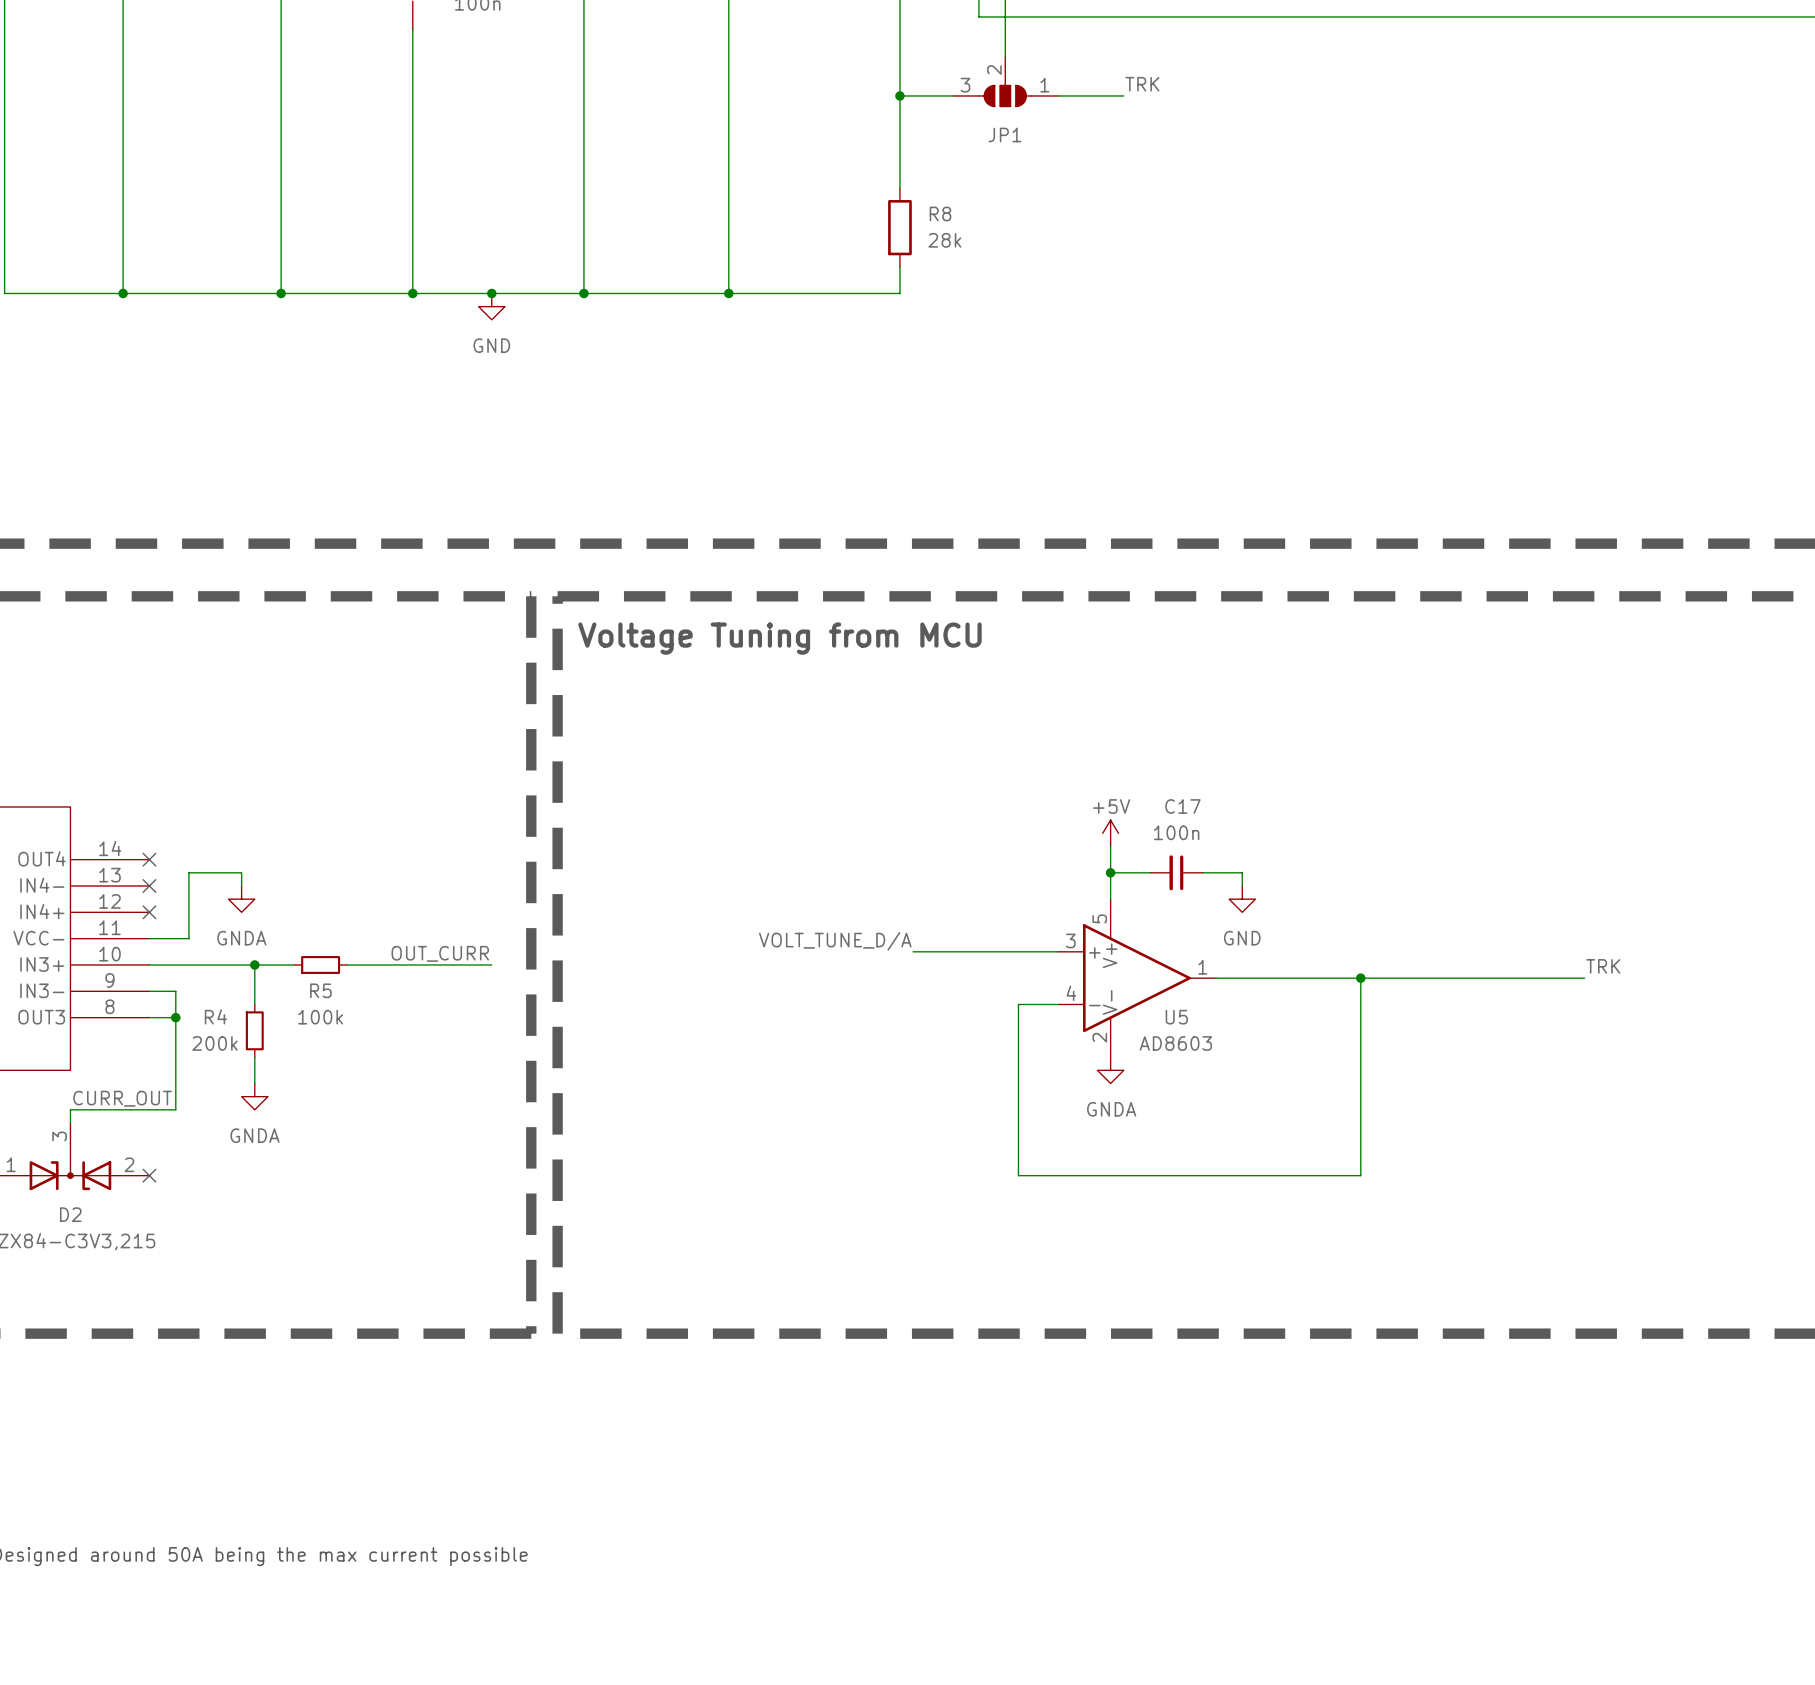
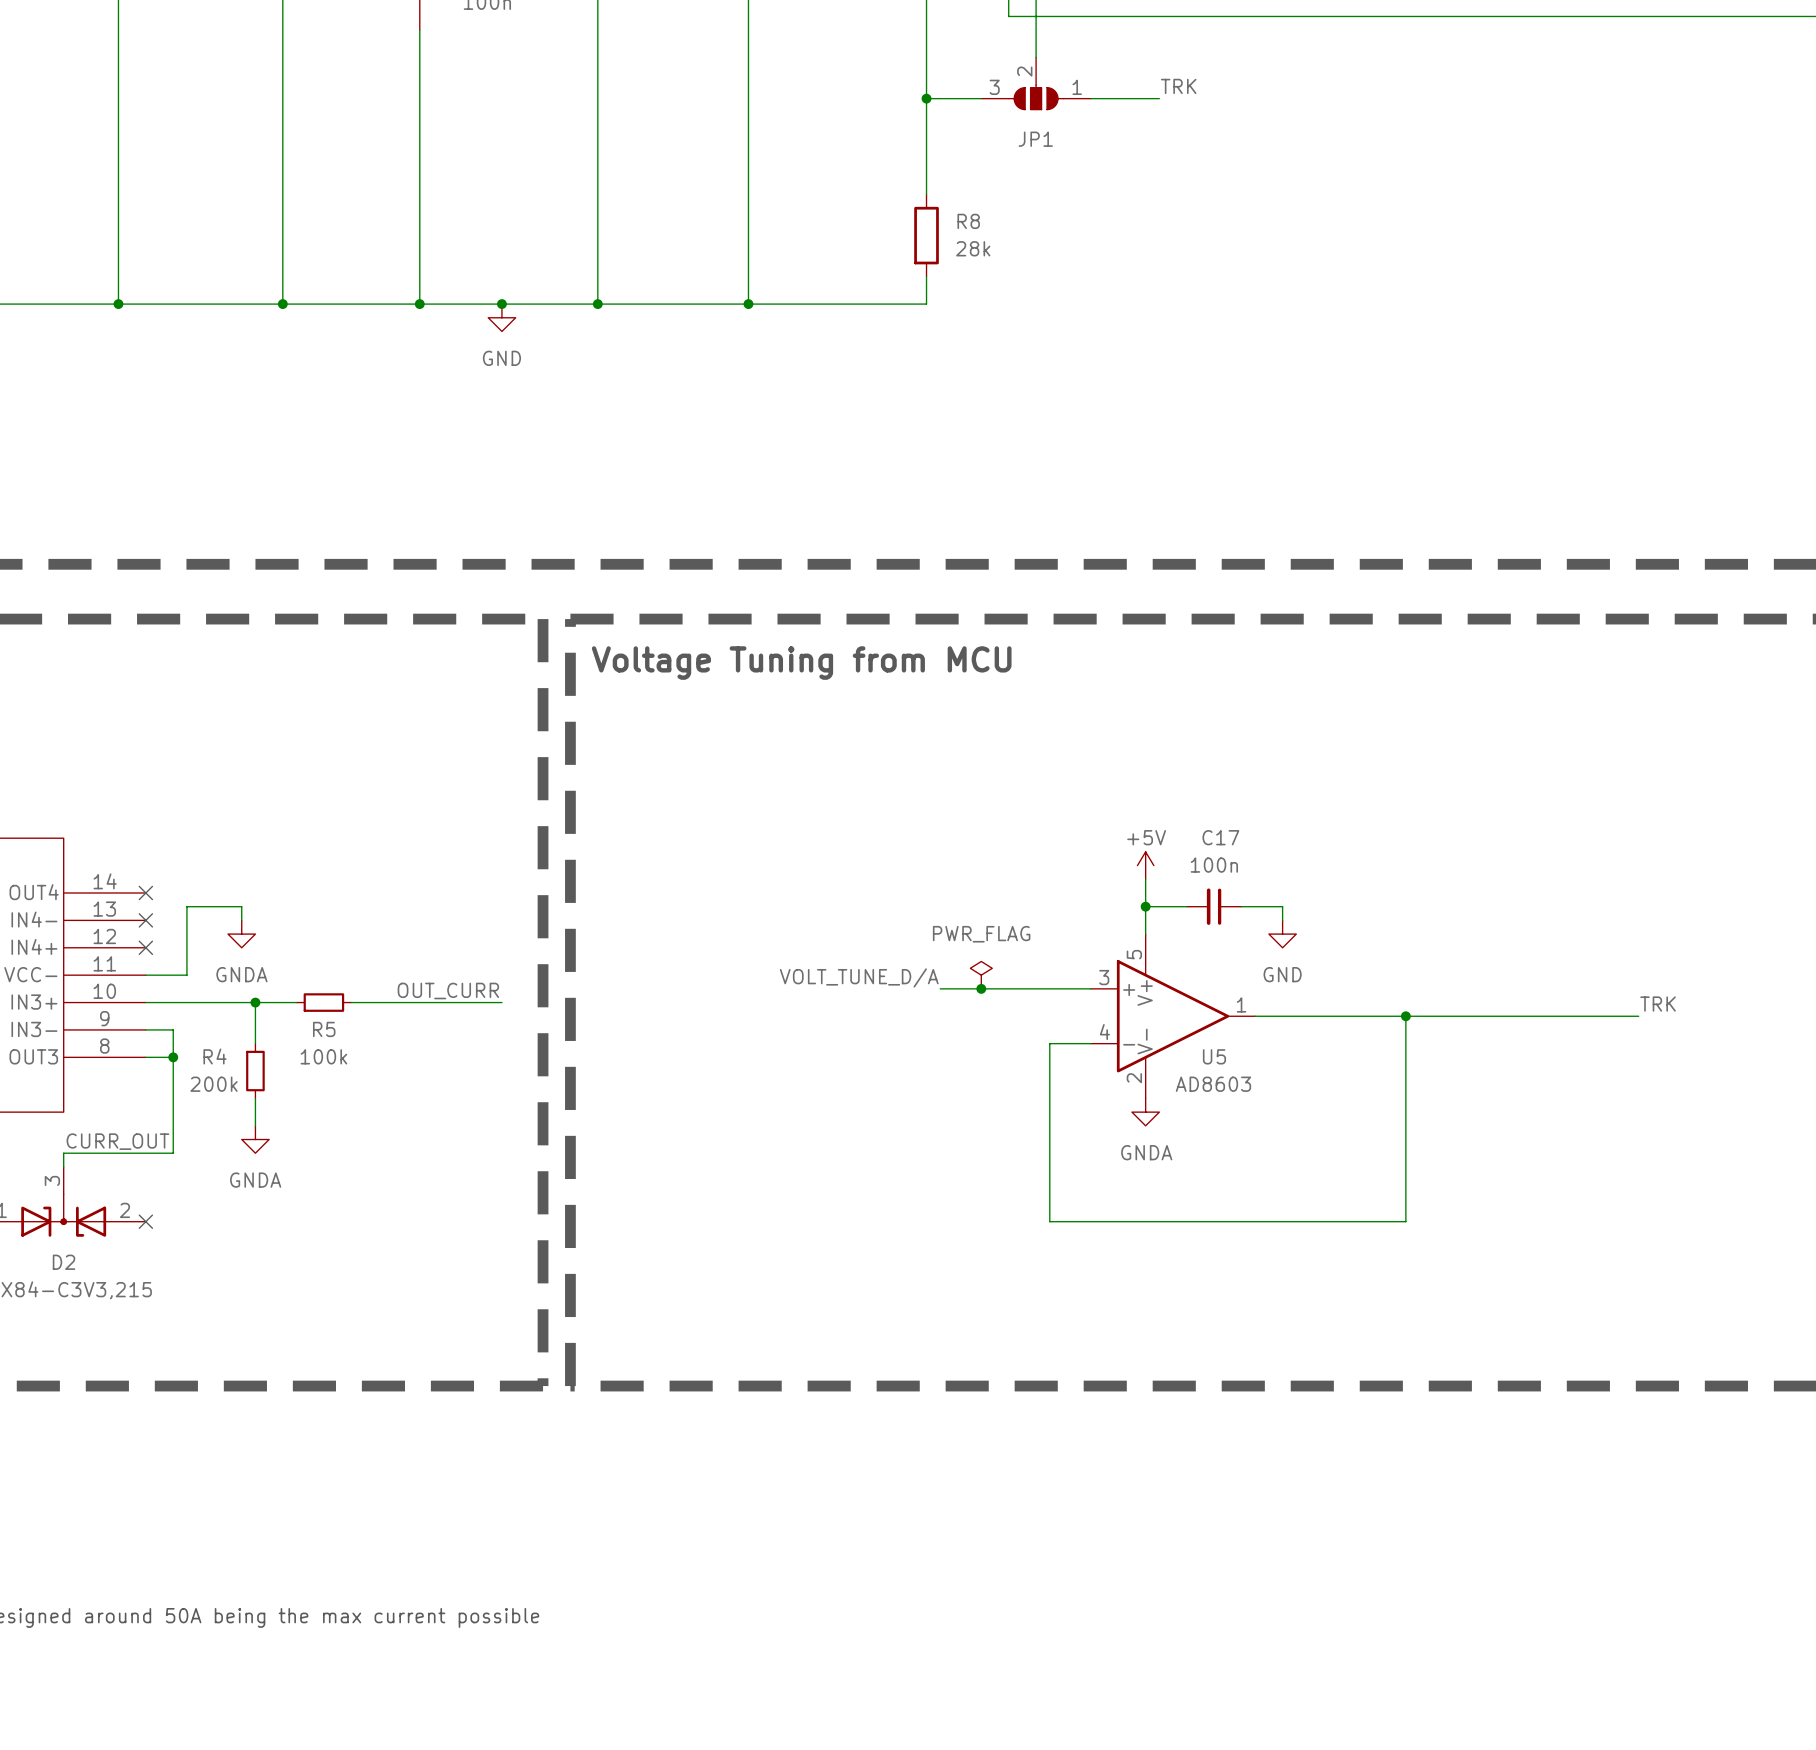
power symbol: none -> PWR_FLAG (981, 975)
junction: none -> (981, 988)

